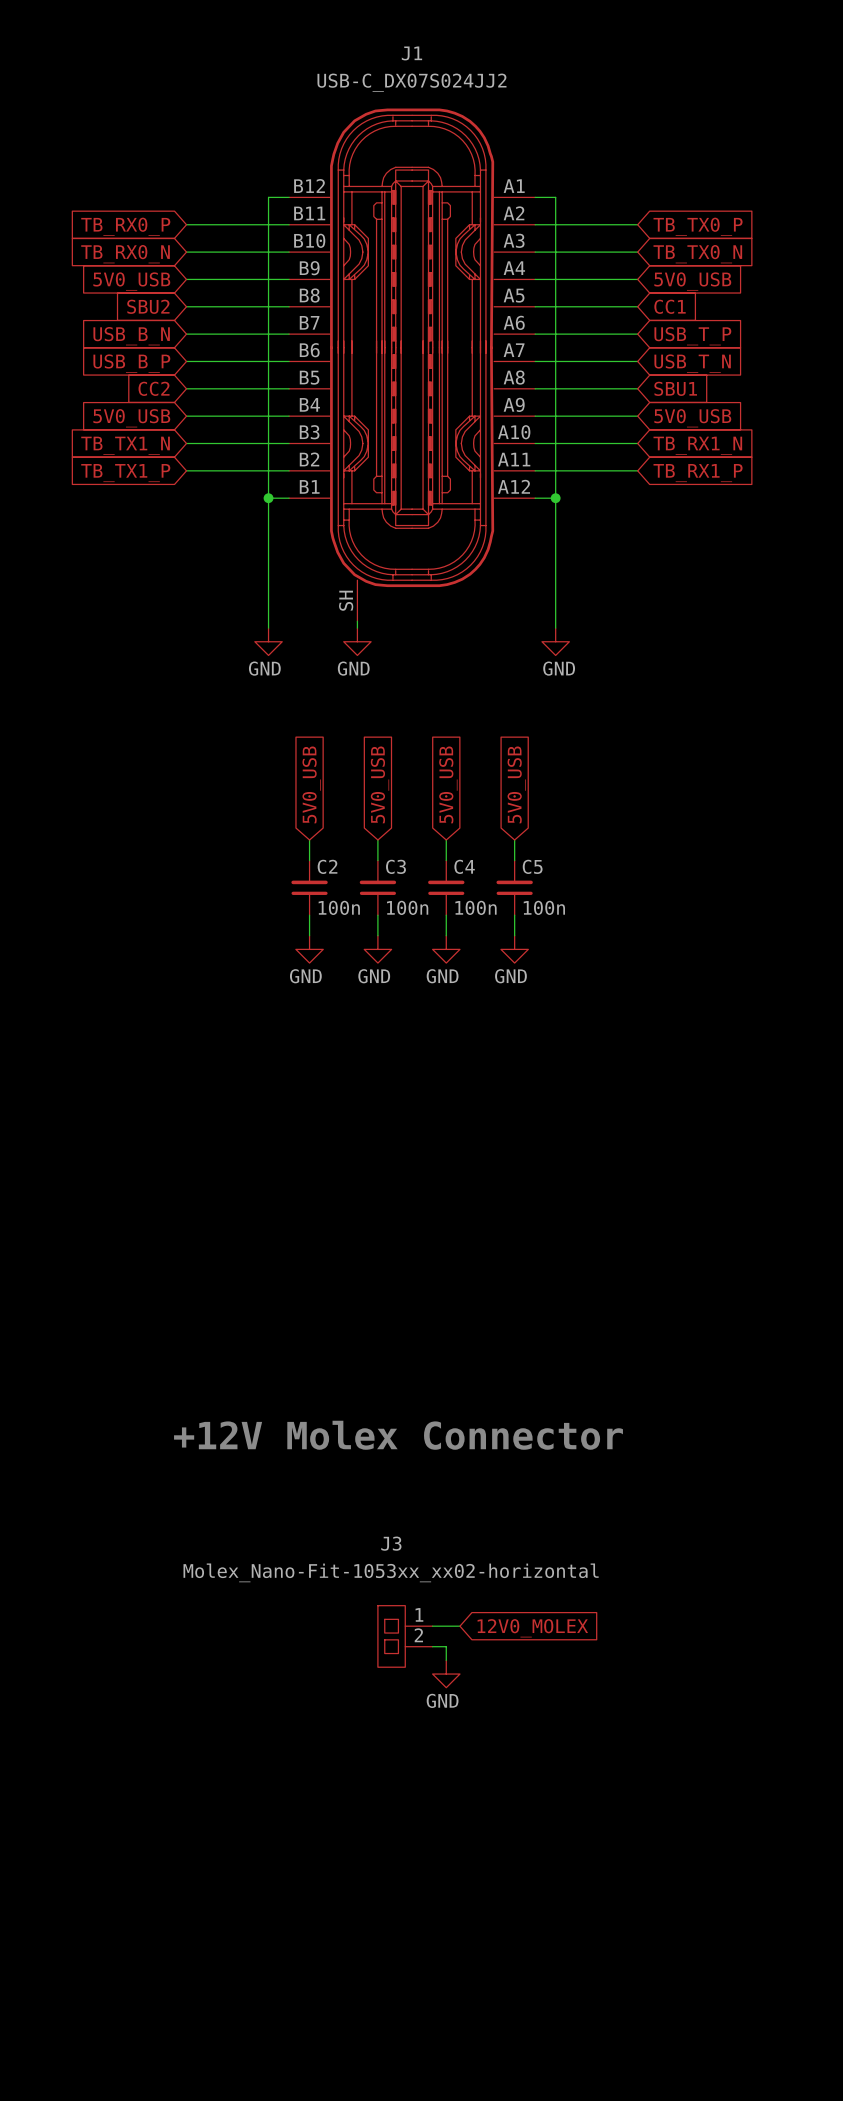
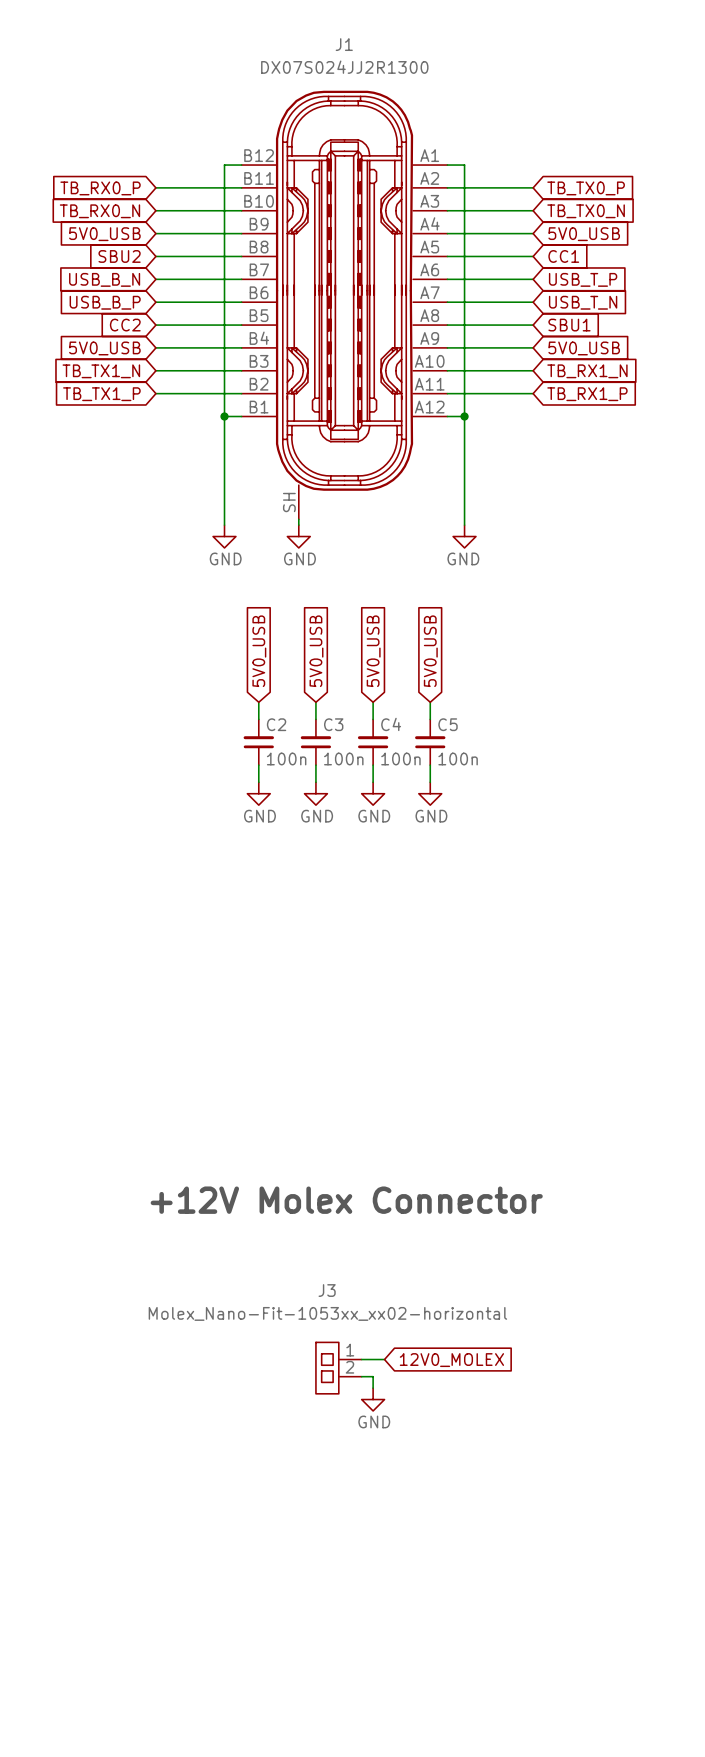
J1 value: USB-C_DX07S024JJ2 (411, 82) -> DX07S024JJ2R1300 (344, 67)

